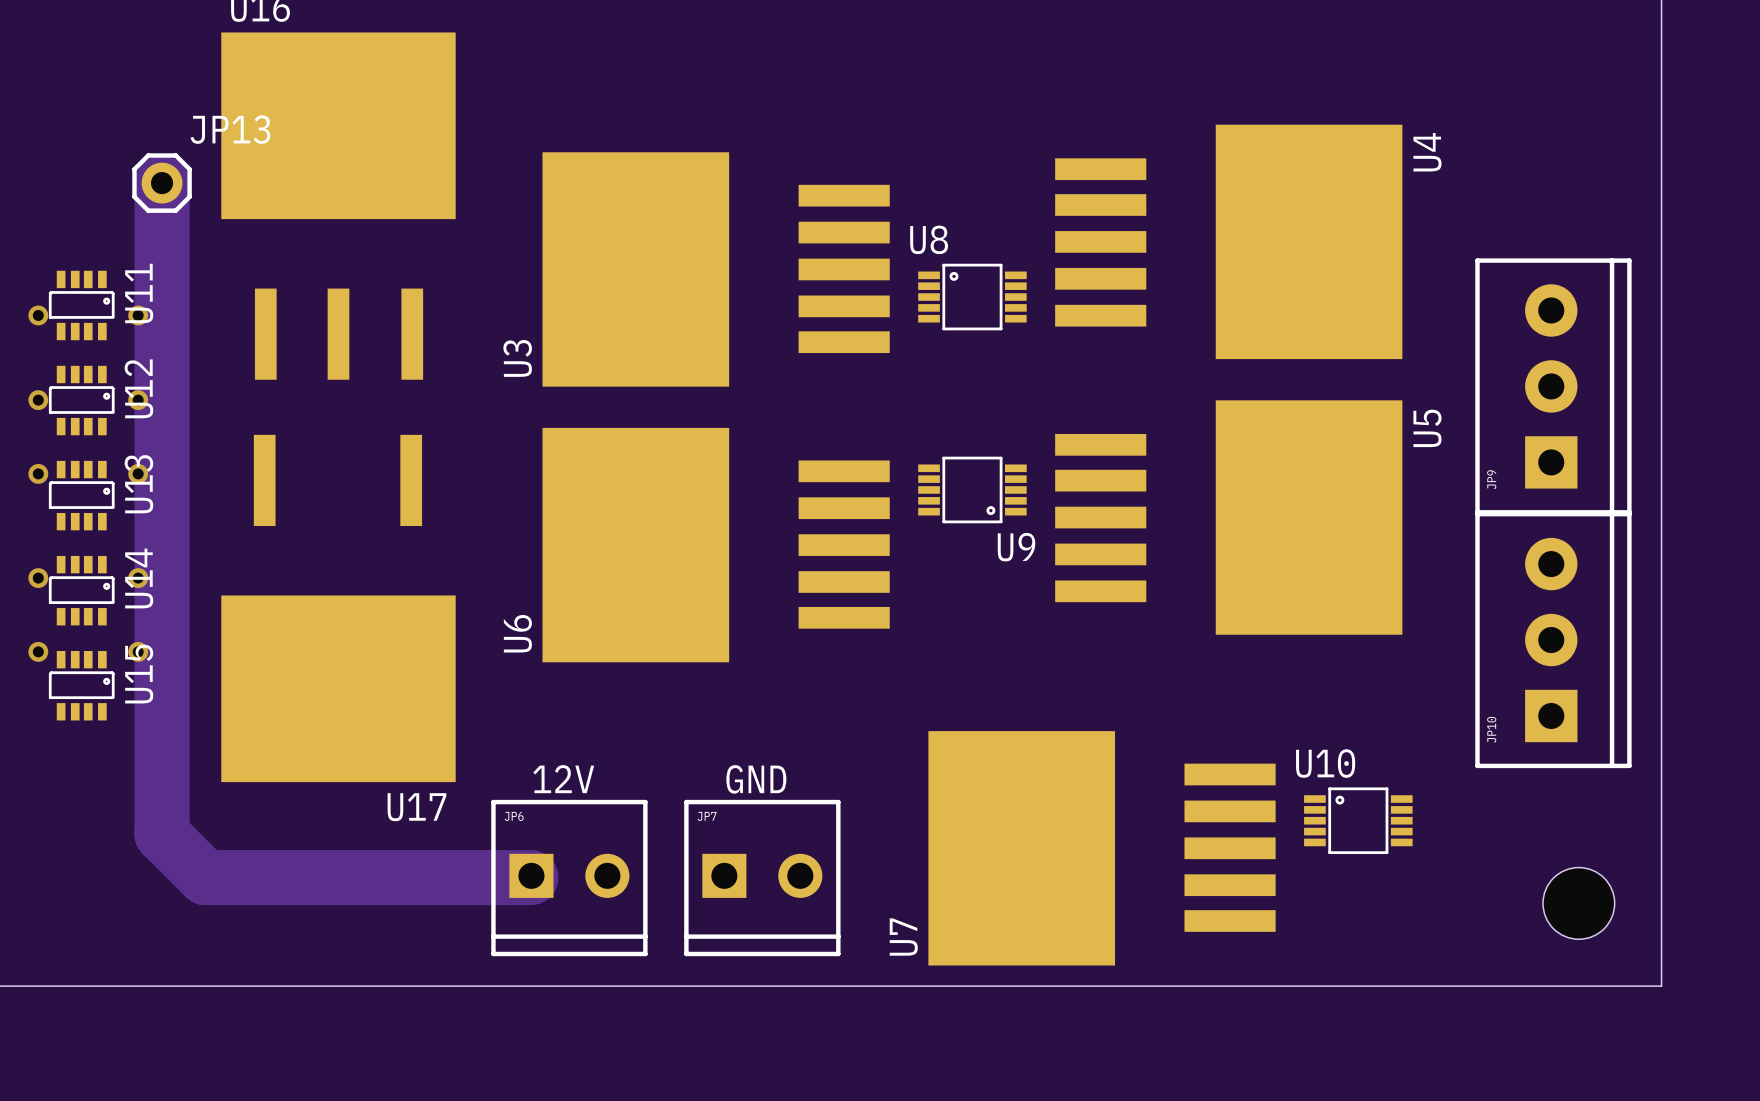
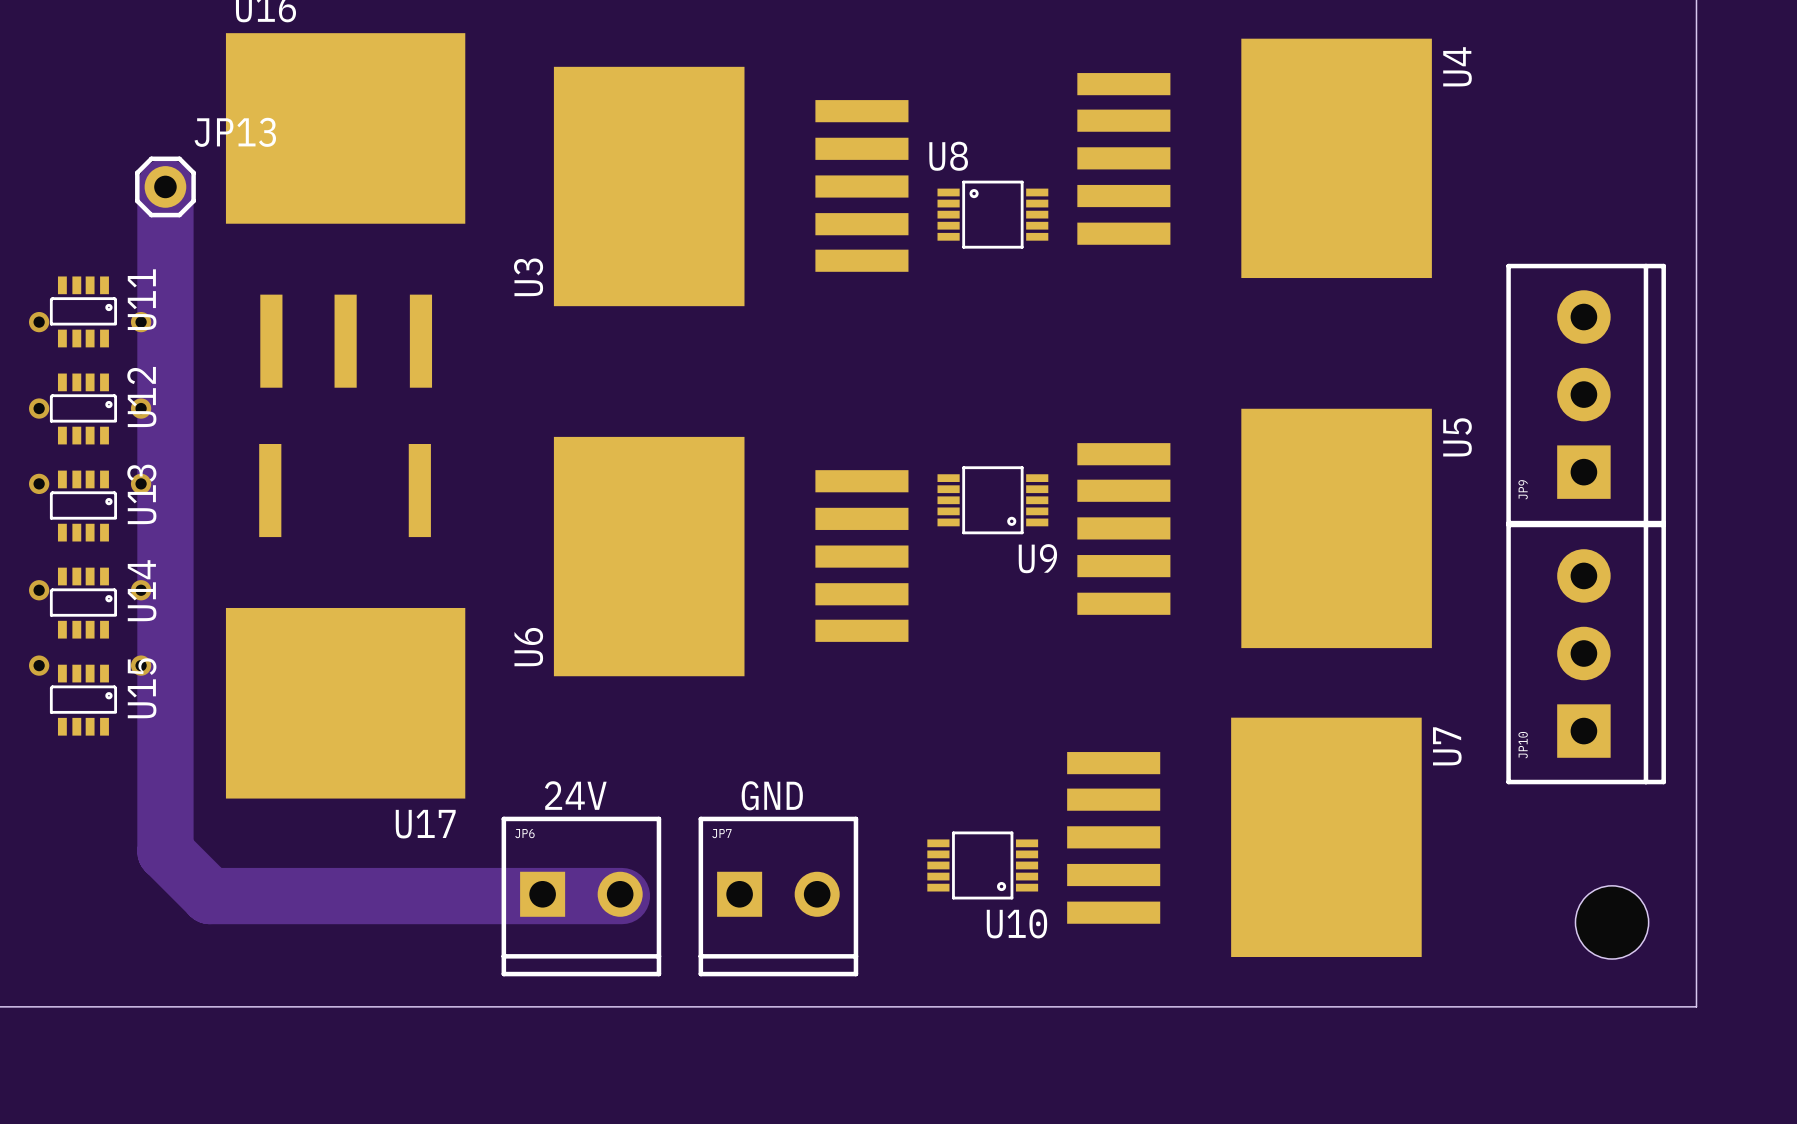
U4 position: (1228, 241) -> (1254, 158)
U3 position: (716, 269) -> (731, 186)
U8 position: (972, 297) -> (992, 214)
text: 12V (563, 779) -> 24V (575, 795)
U10 rotation: 0° (1358, 820) -> 180° (982, 865)
U10 position: (1358, 820) -> (982, 865)
U7 rotation: 0° (1102, 848) -> 180° (1244, 837)
track: none -> (542, 896) (621, 896)

